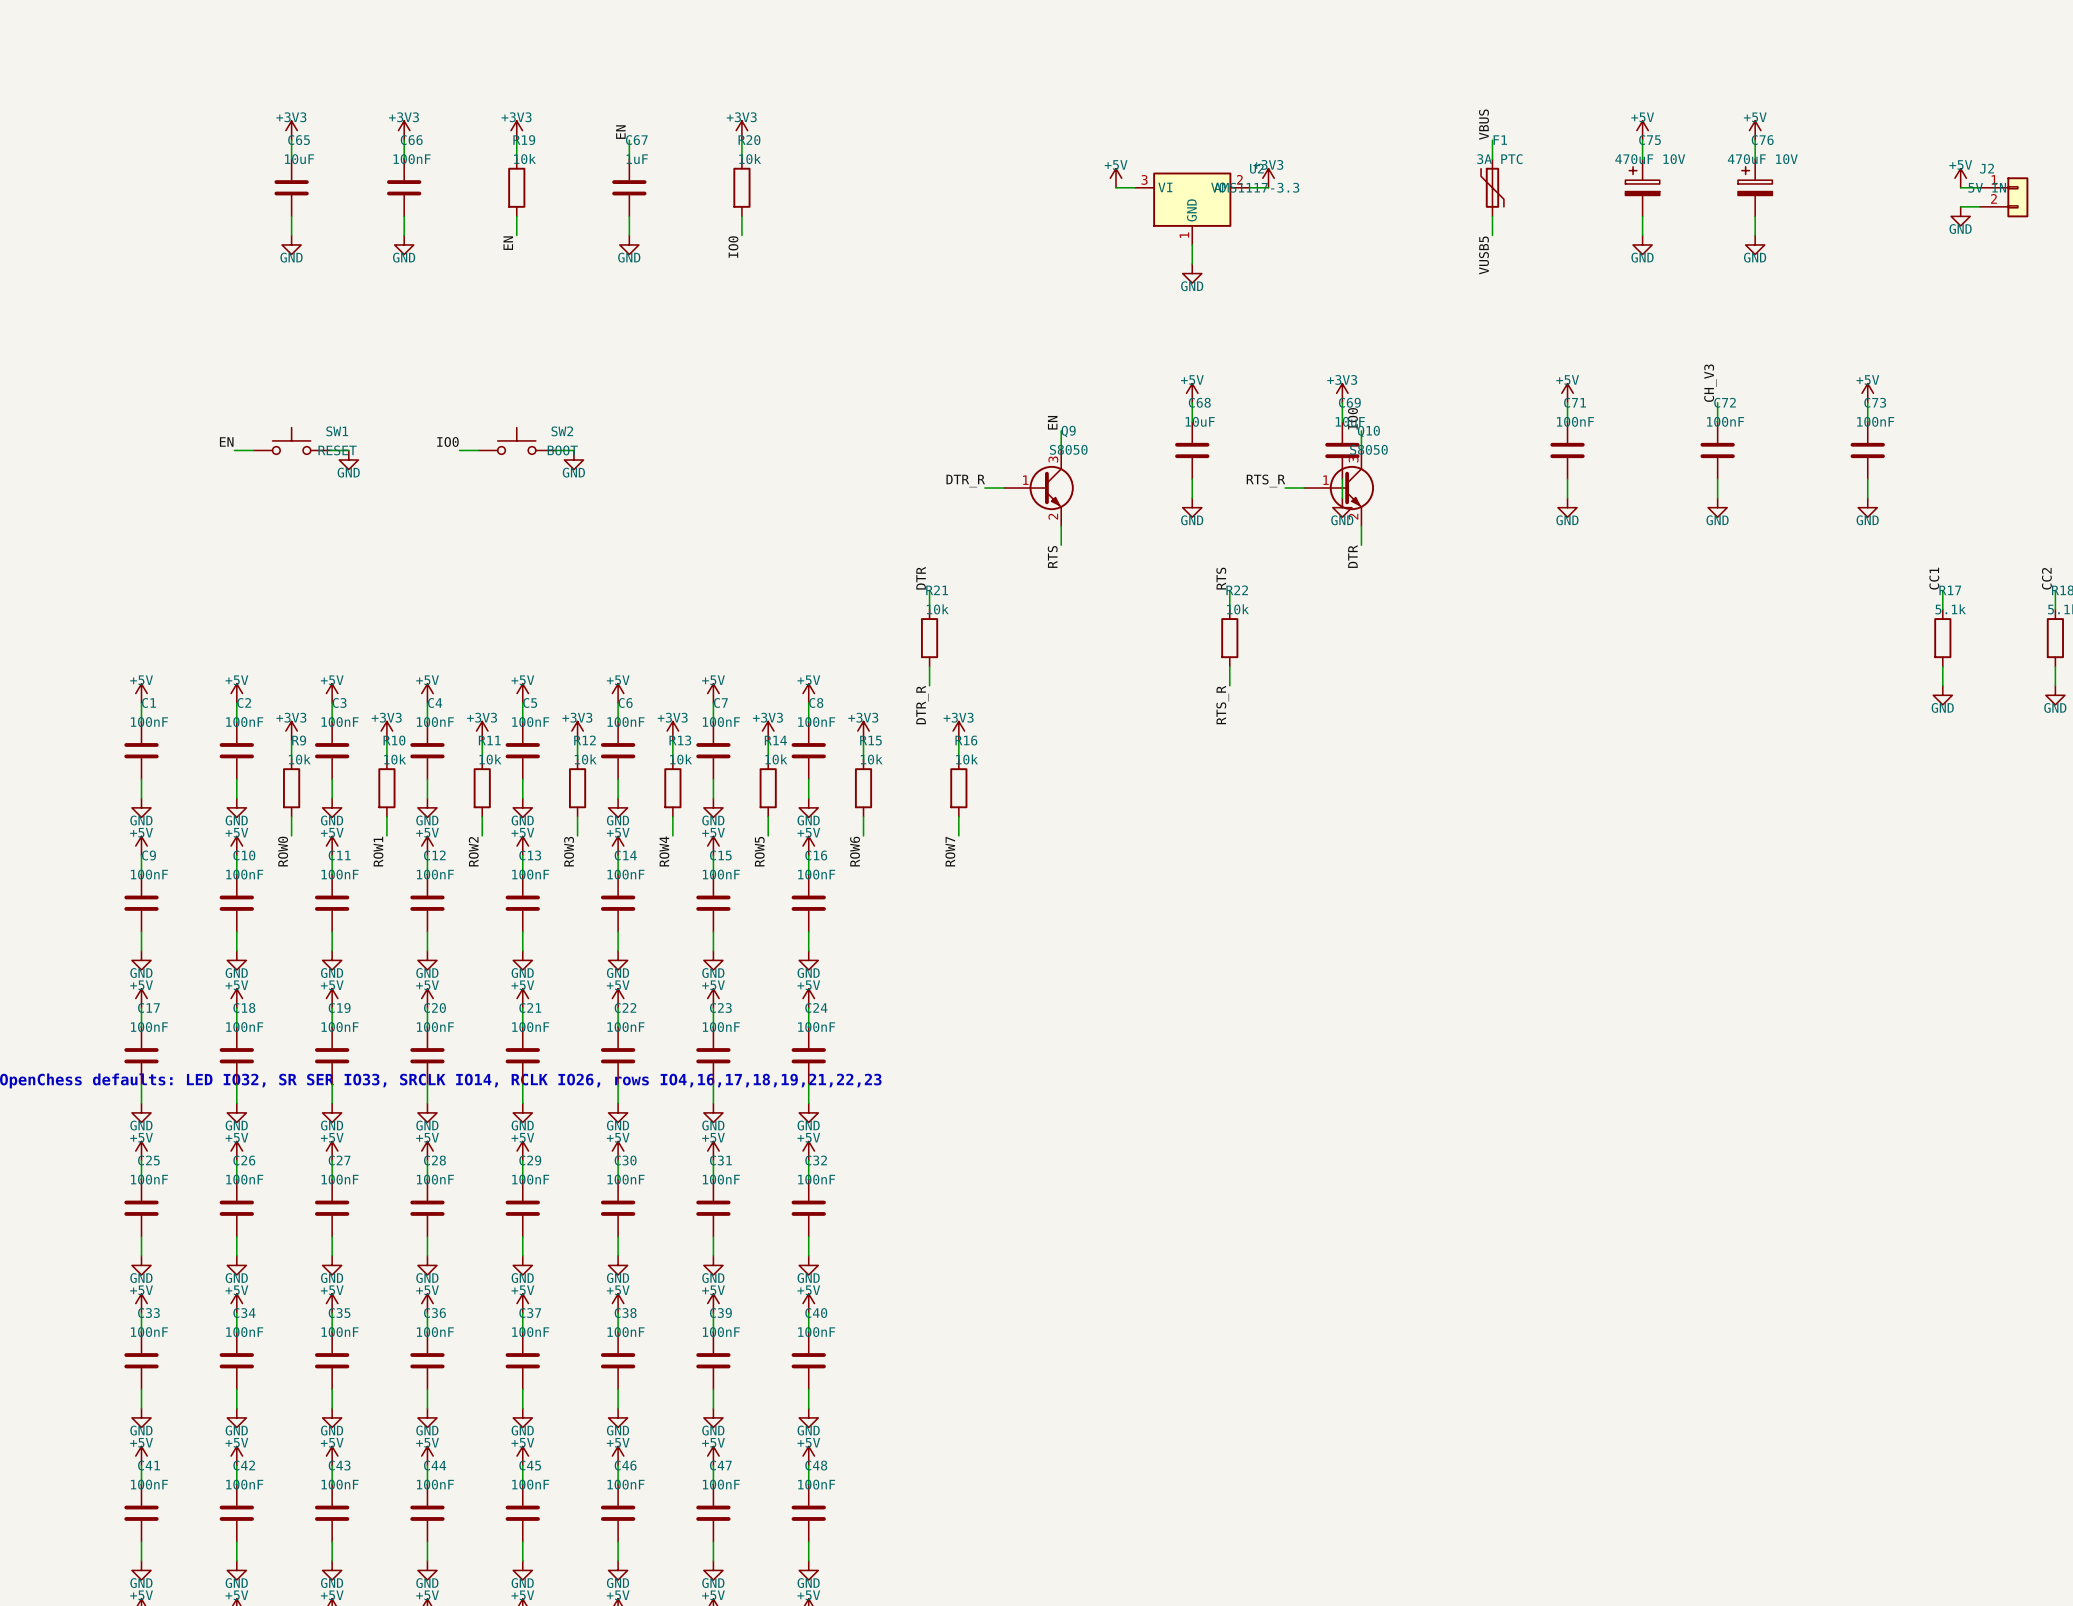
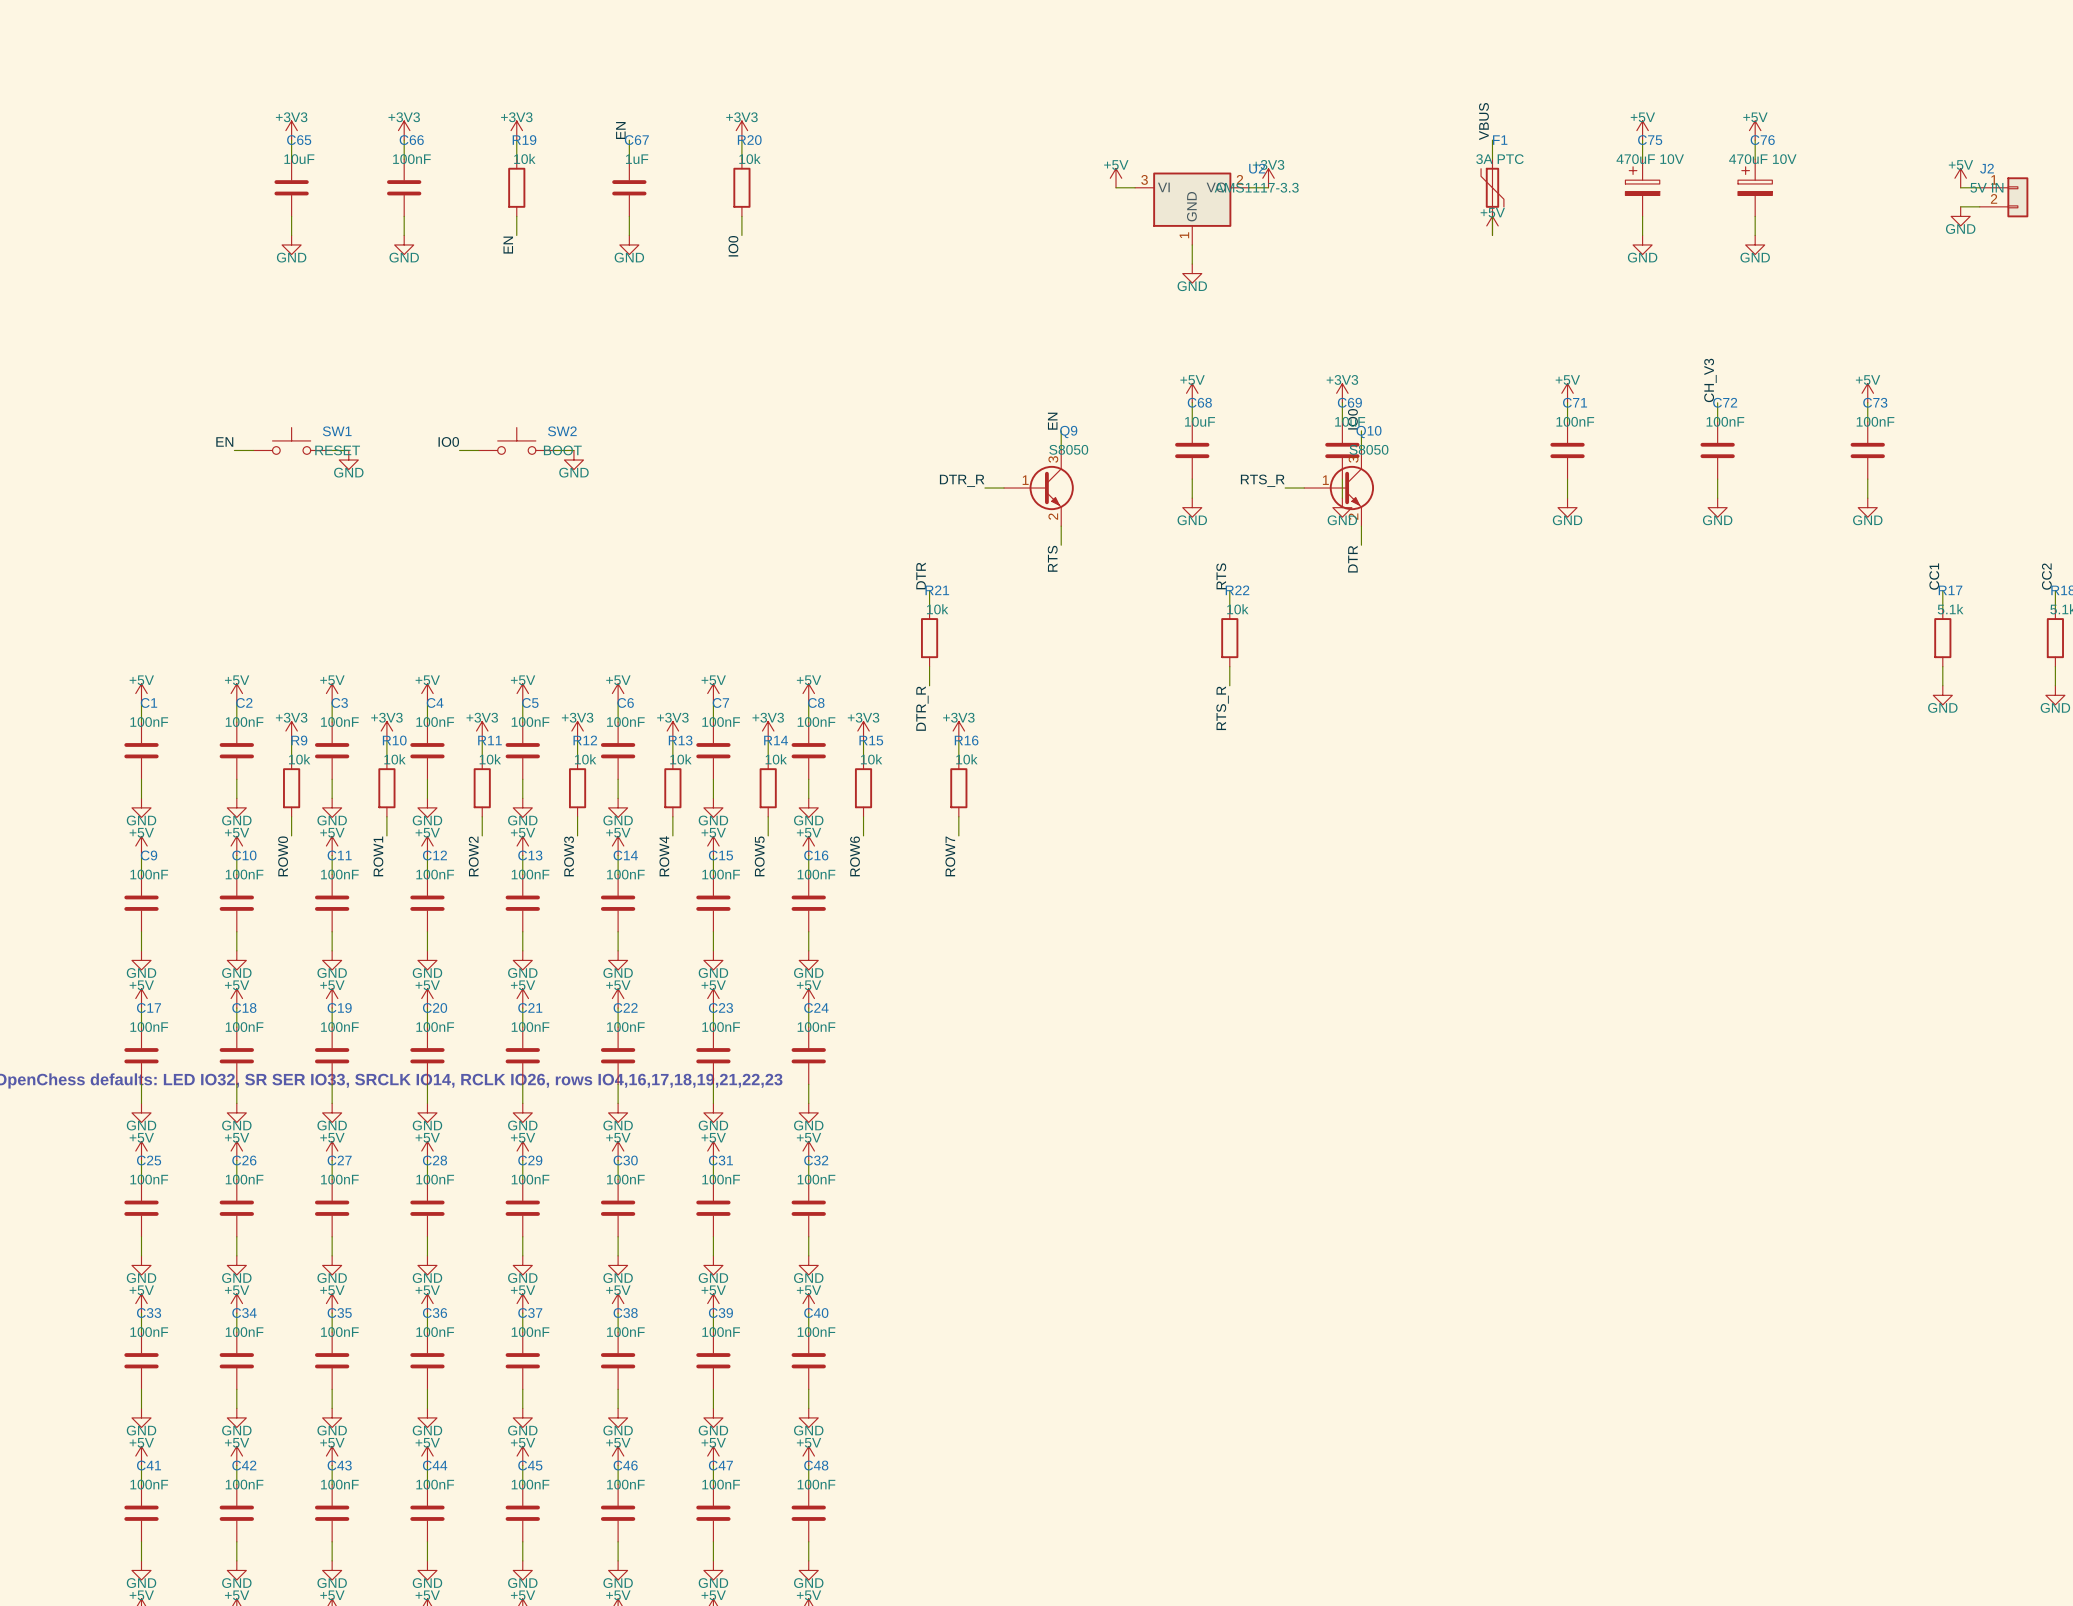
power symbol: none -> +5V (1492, 225)
label: VUSB5 (1483, 255) -> none

